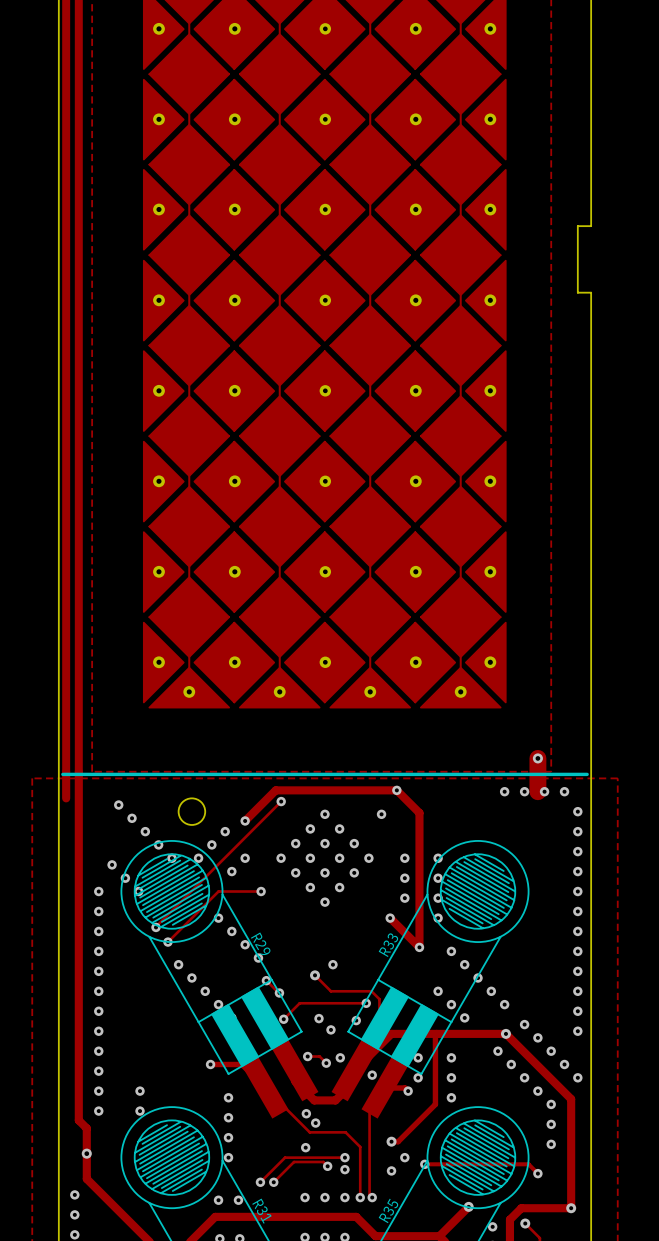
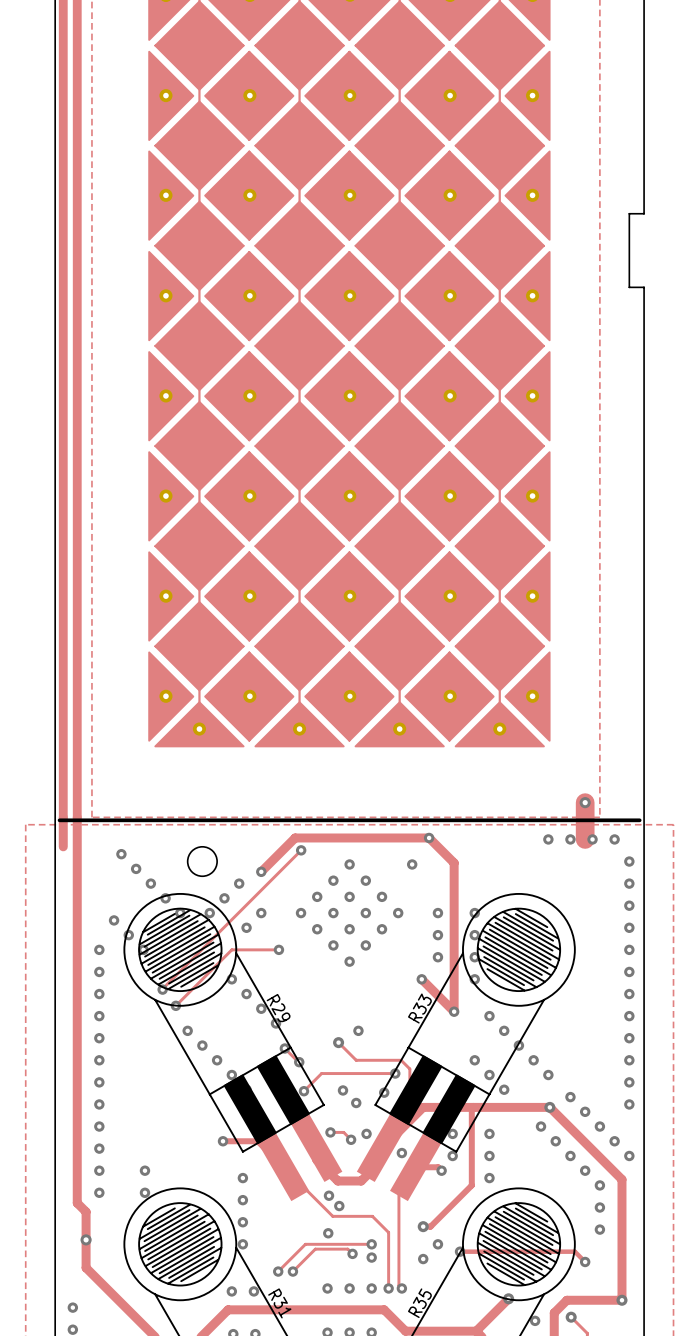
via: (74, 1194) -> none

